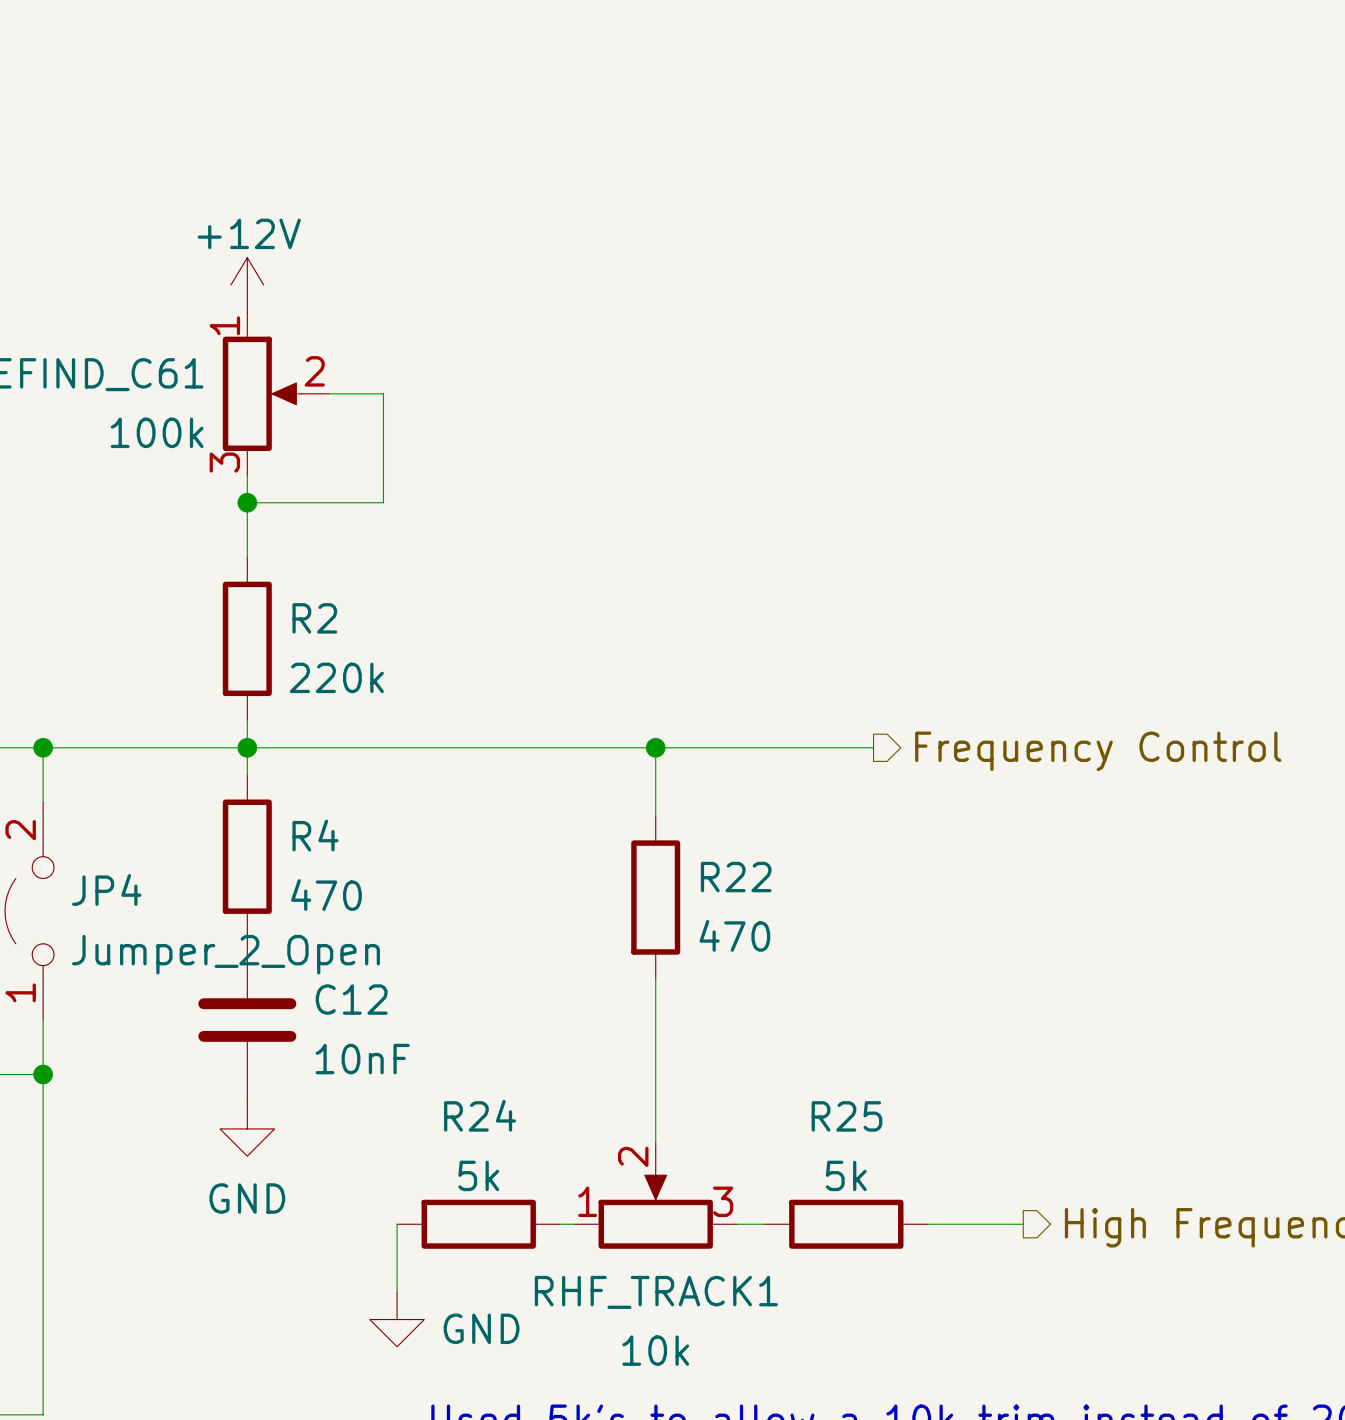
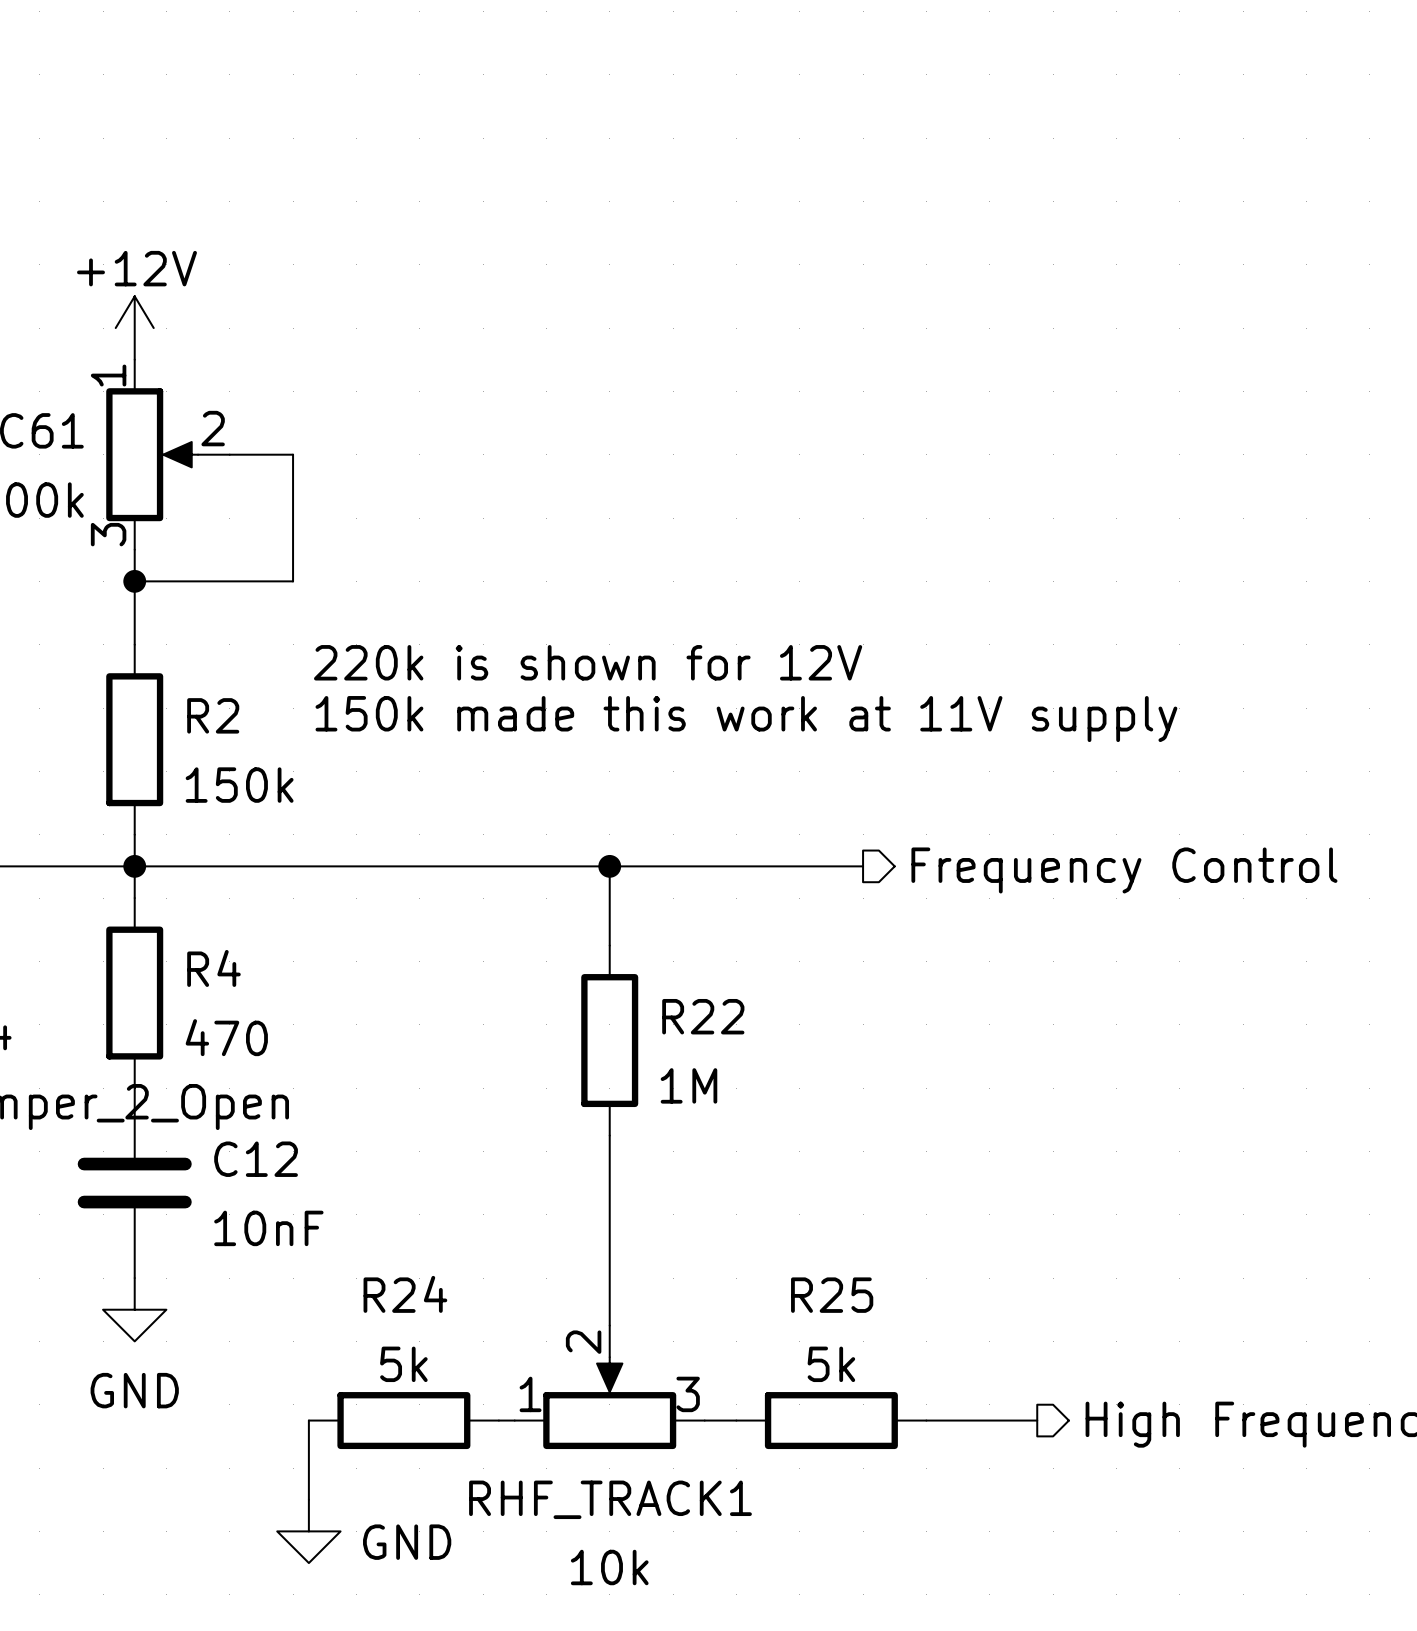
text: none -> 220k is shown for 12V (588, 662)
text: none -> 150k made this work at 11V supply (746, 719)
R2 value: 220k (336, 677) -> 150k (239, 785)
R22 value: 470 (734, 935) -> 1M (688, 1085)

